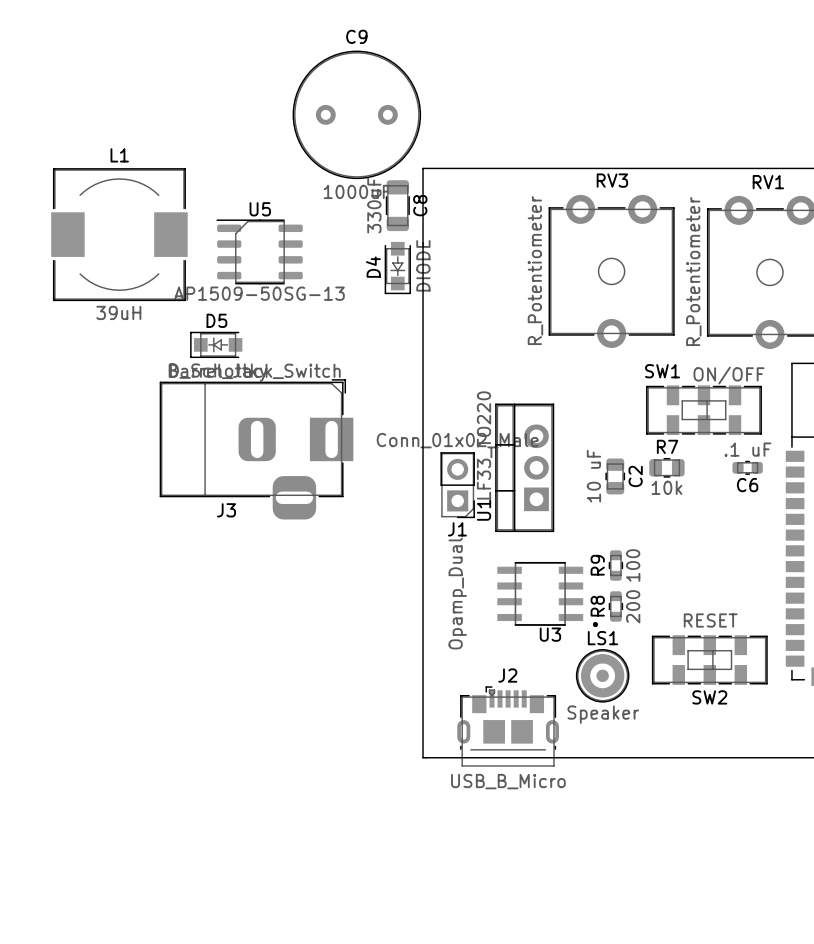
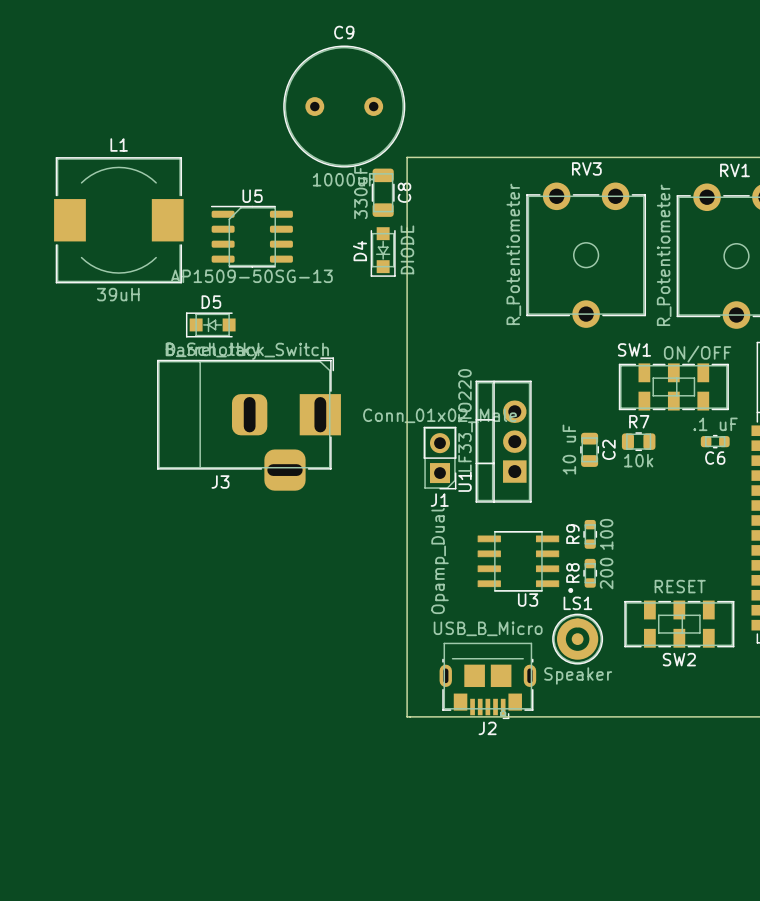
J2 rotation: 0° (508, 726) -> 180° (487, 680)

